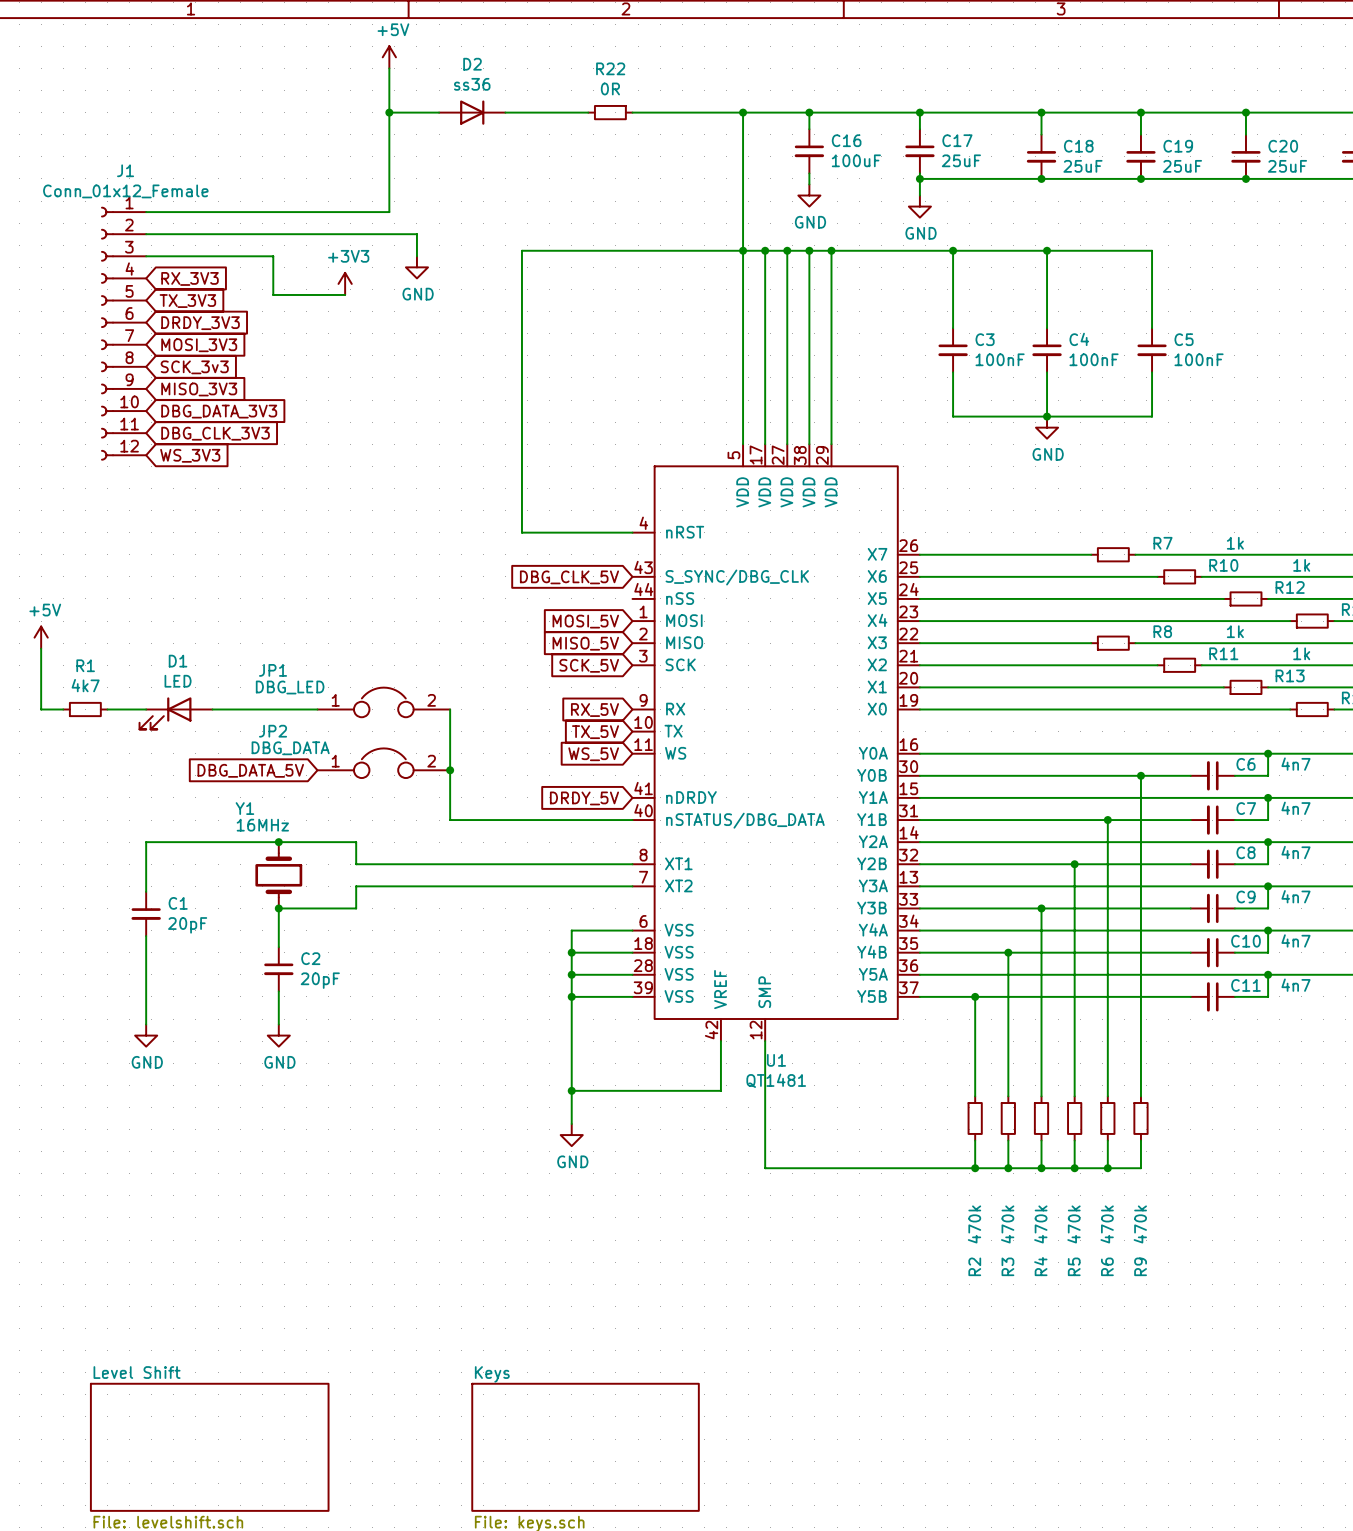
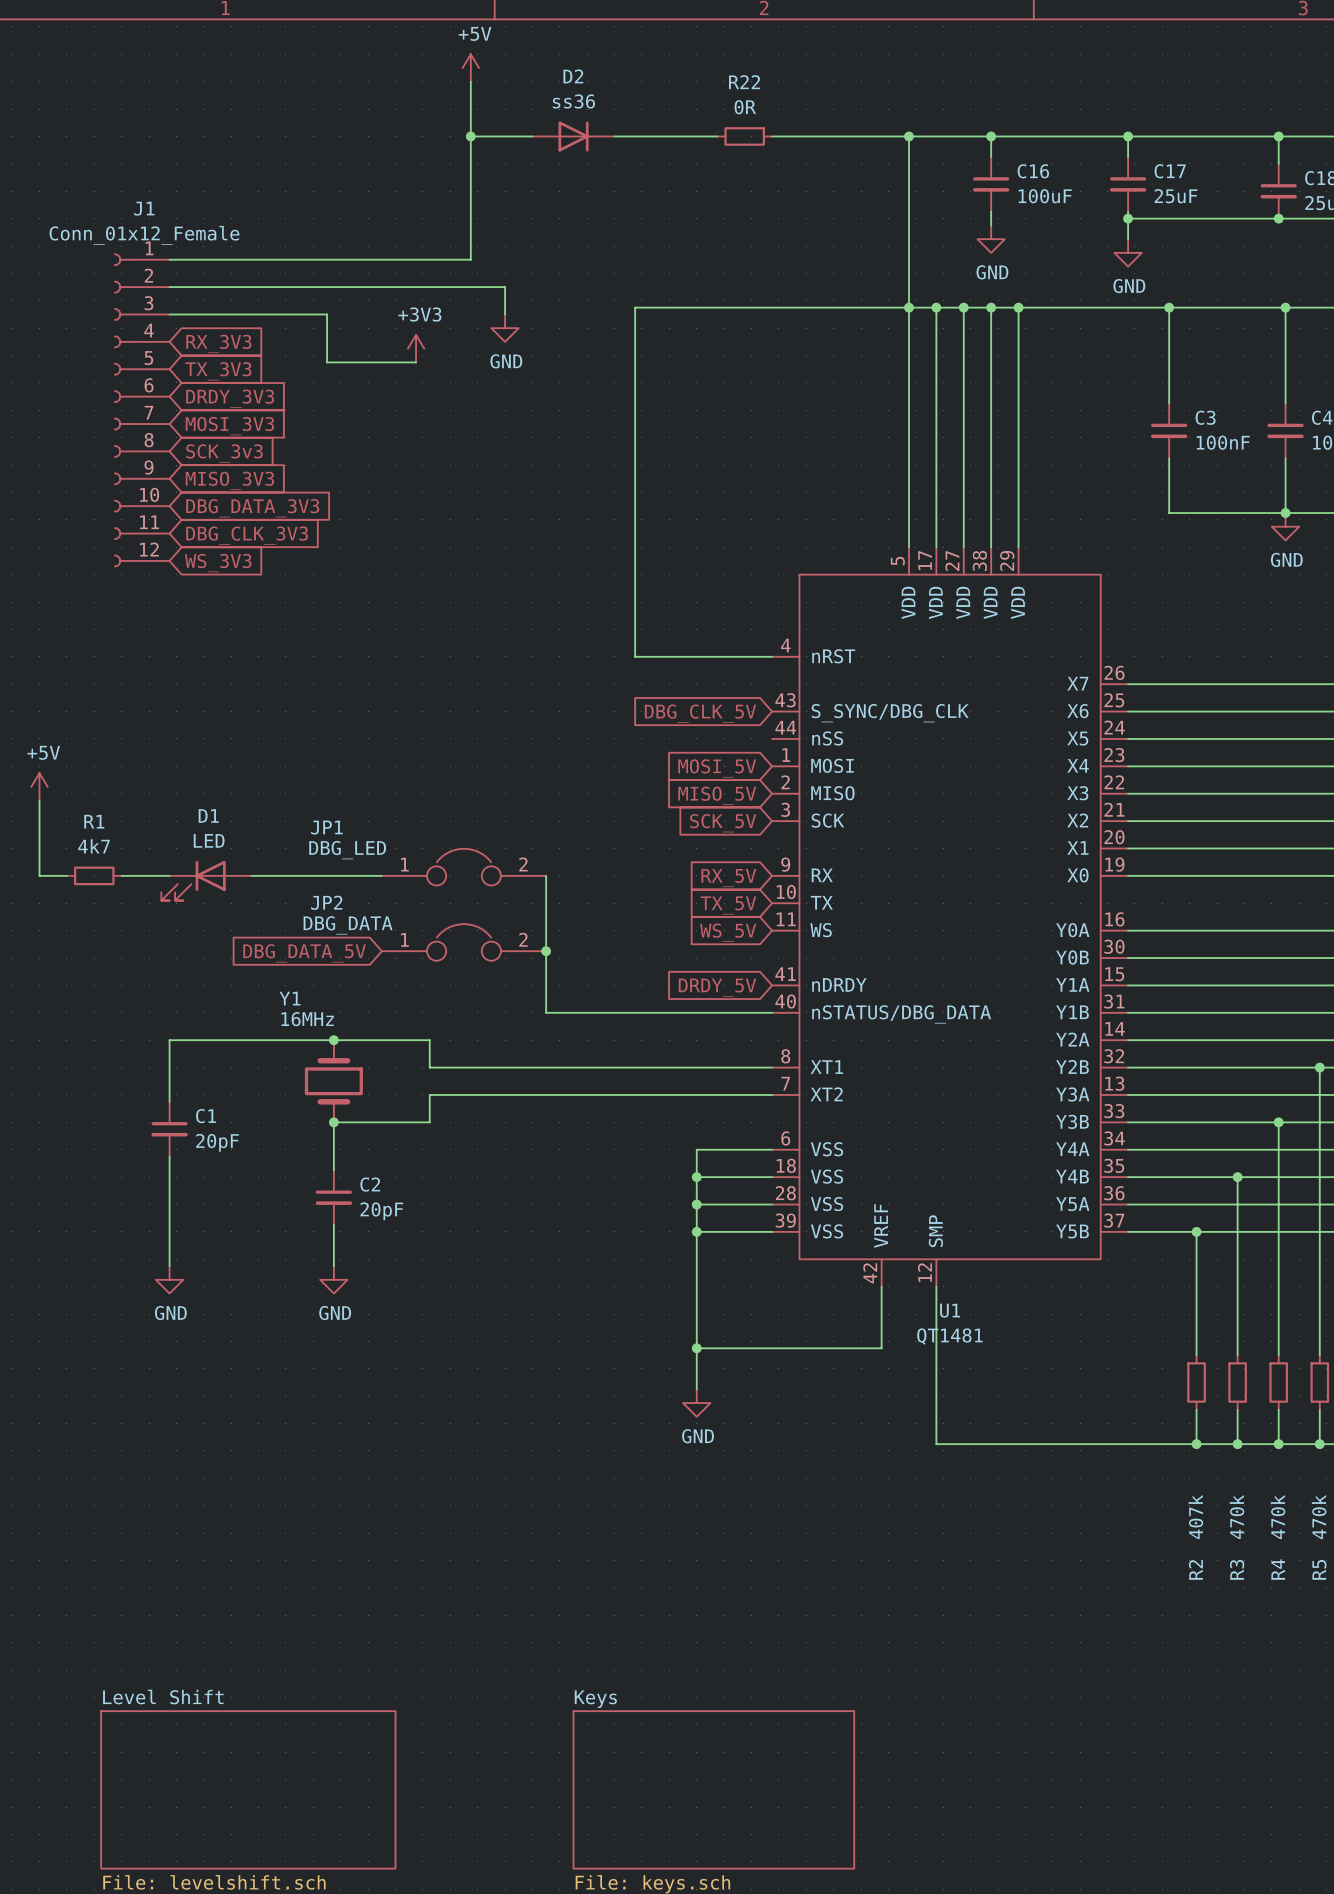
R2 value: 470k (974, 1224) -> 407k (1195, 1517)

